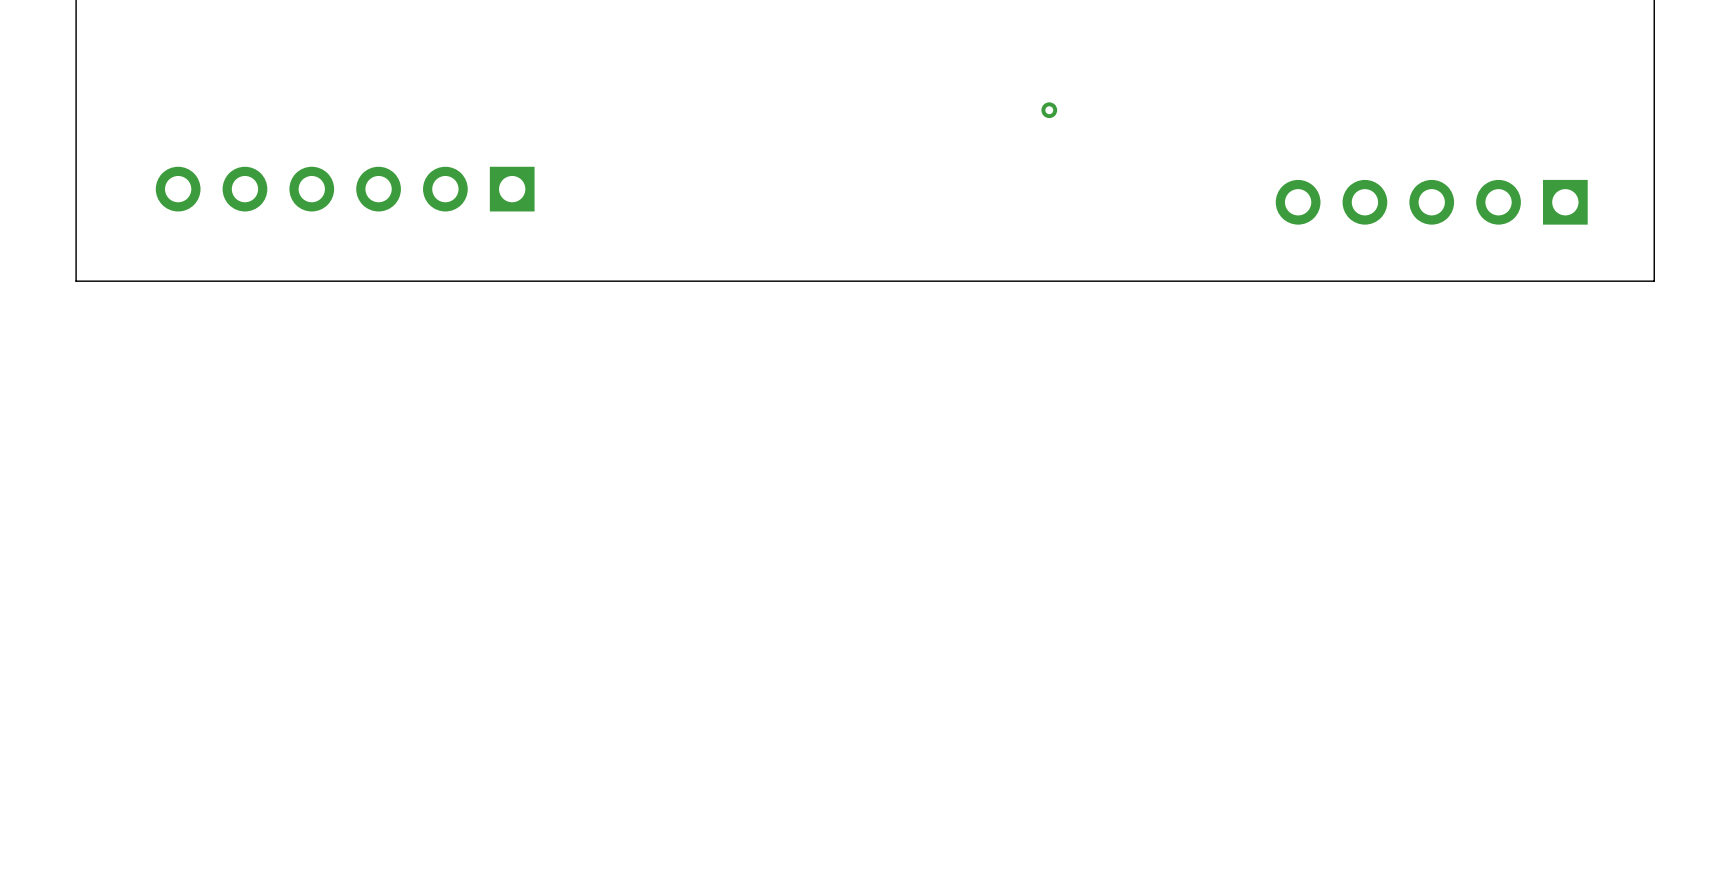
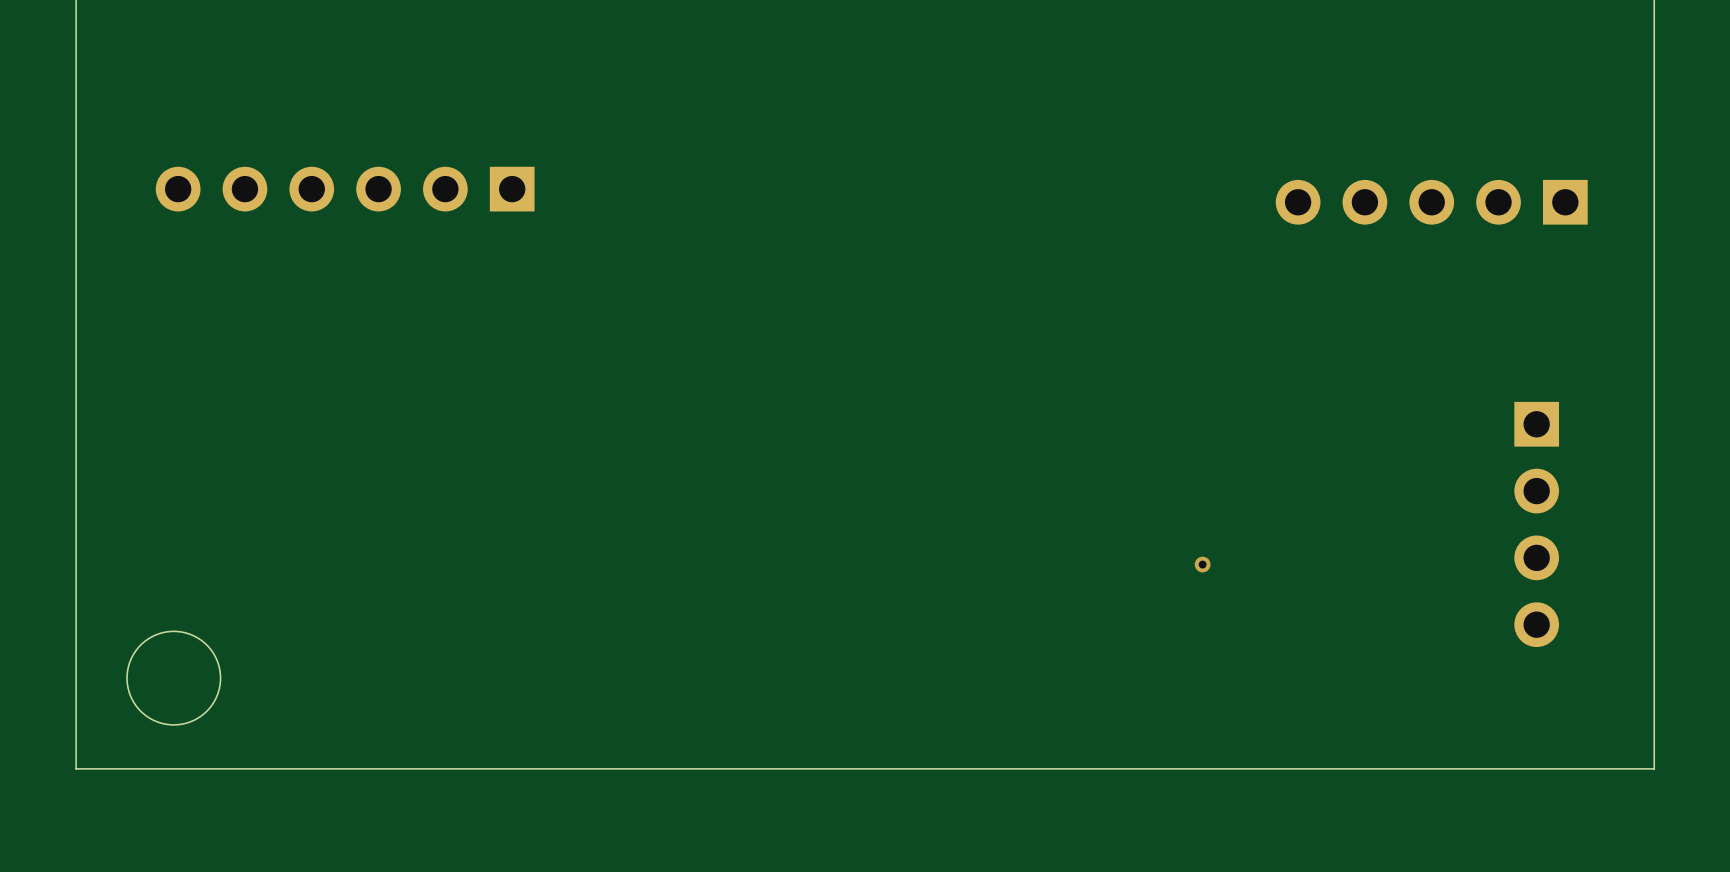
via: (1049, 110) -> none
board edge: (1654, 281) (76, 281) -> (1654, 281) (1654, 768) (76, 768) (76, 281)
part: none -> (1536, 524)
via: none -> (1202, 564)
round board edge: none -> [126, 630, 222, 726]

